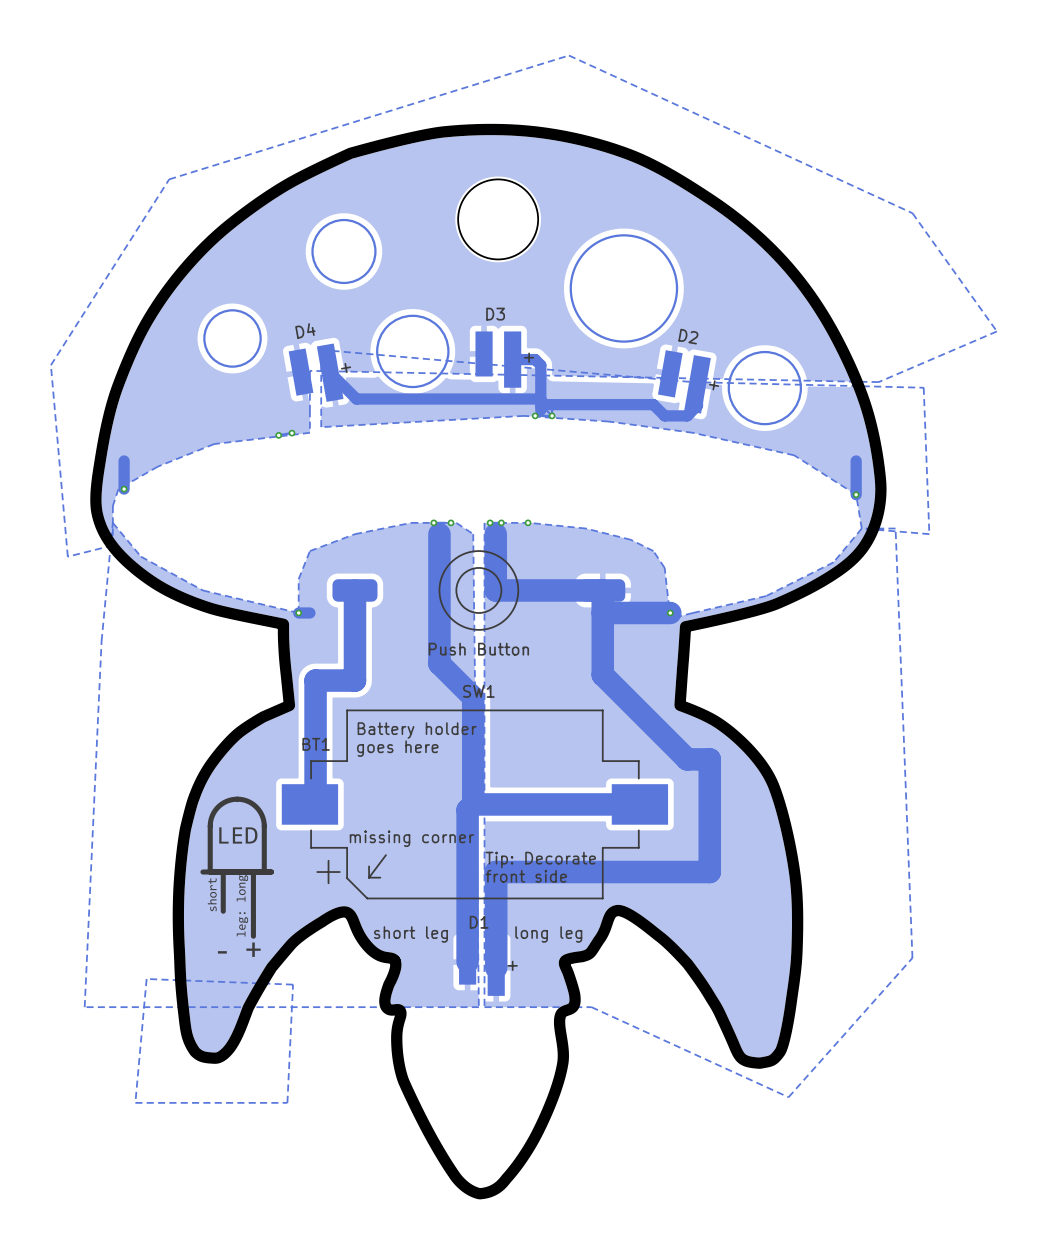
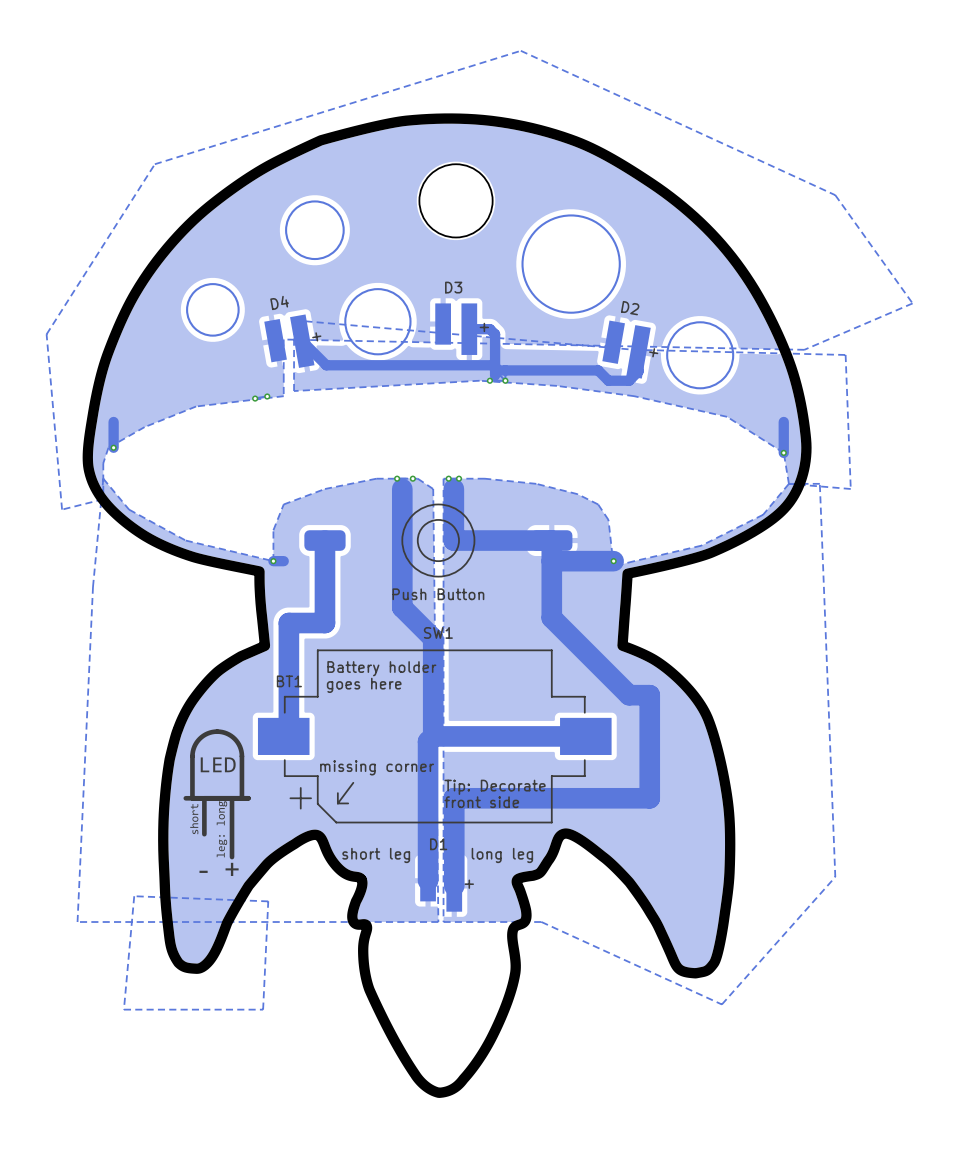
via: (528, 522) -> none

